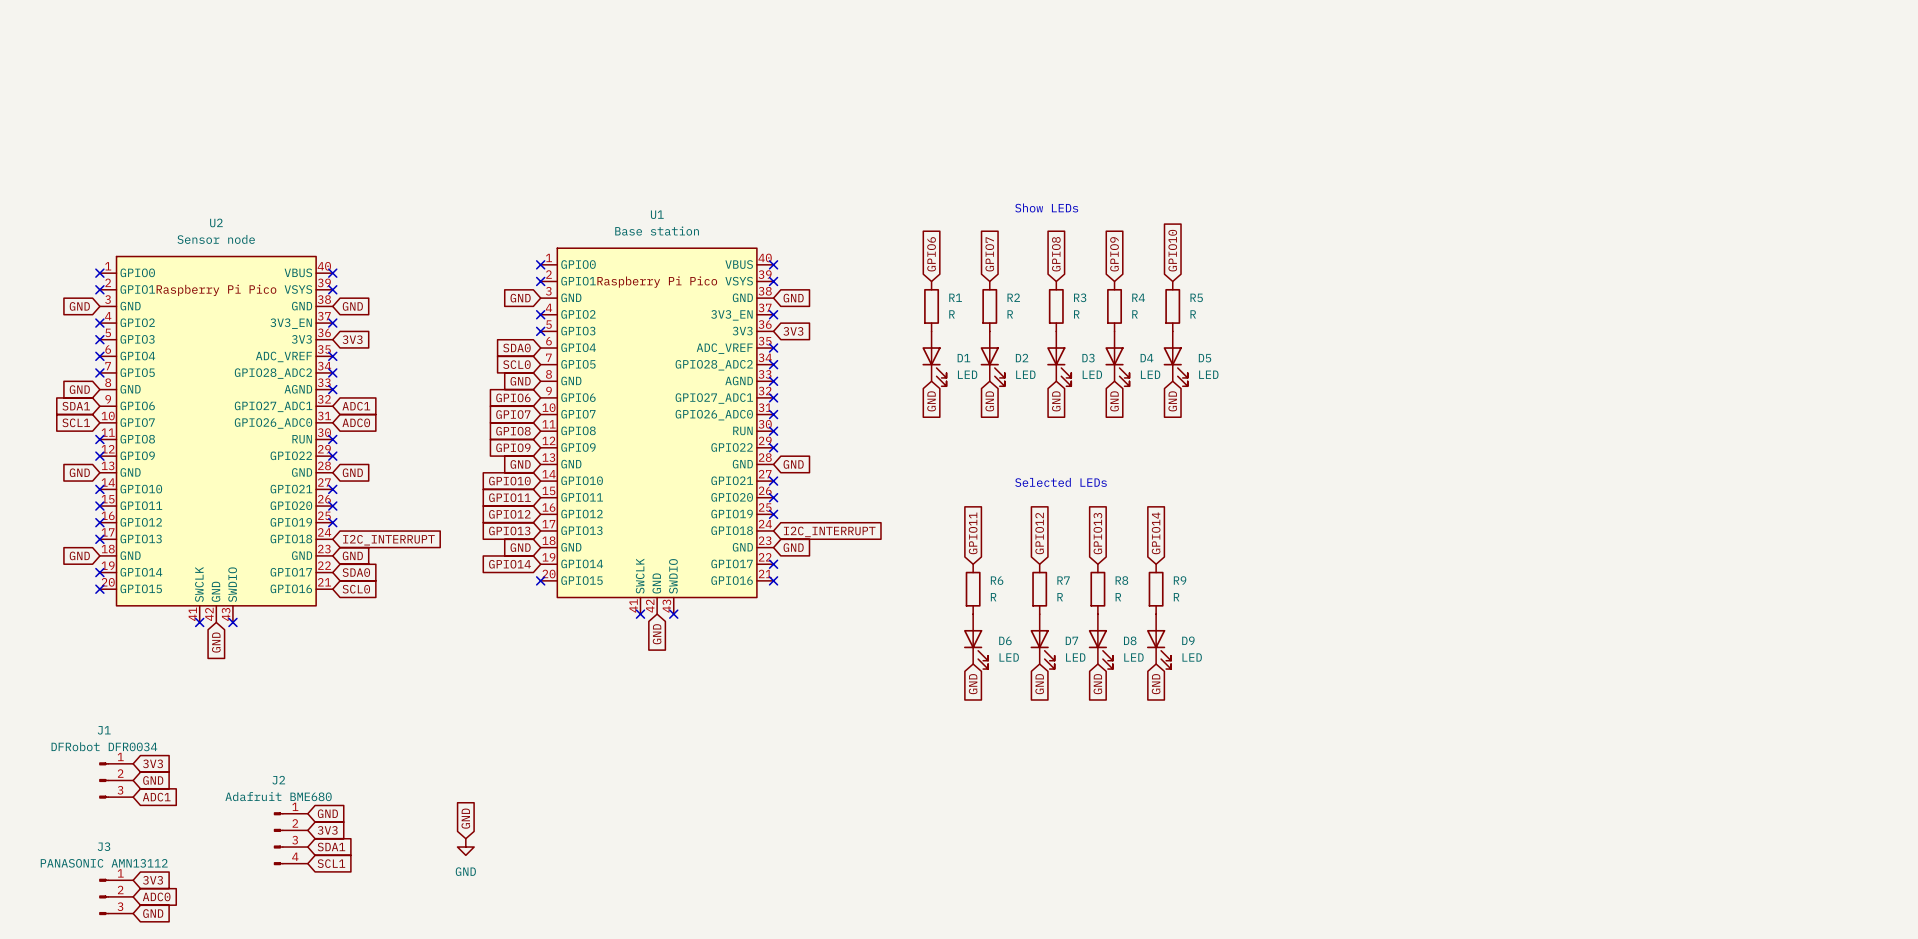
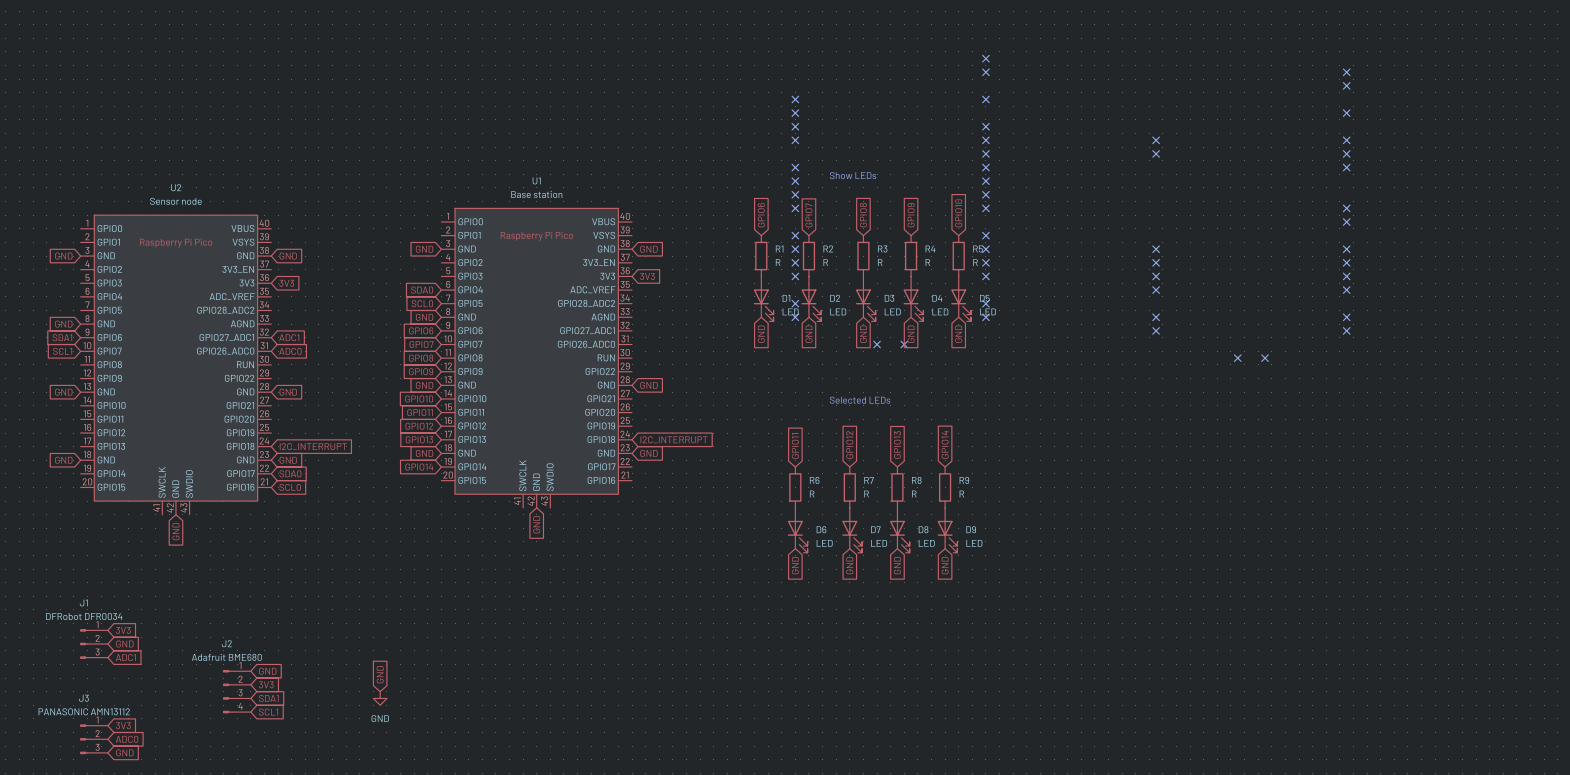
no-connect mark: none -> (985, 58)
no-connect mark: none -> (985, 72)
no-connect mark: none -> (1346, 72)
no-connect mark: none -> (1346, 85)
no-connect mark: none -> (795, 99)
no-connect mark: none -> (985, 99)
no-connect mark: none -> (795, 113)
no-connect mark: none -> (1346, 113)
no-connect mark: none -> (795, 126)
no-connect mark: none -> (985, 126)
no-connect mark: none -> (795, 140)
no-connect mark: none -> (985, 140)
no-connect mark: none -> (1156, 140)
no-connect mark: none -> (1346, 140)
no-connect mark: none -> (985, 153)
no-connect mark: none -> (1156, 153)
no-connect mark: none -> (1346, 153)
no-connect mark: none -> (795, 167)
no-connect mark: none -> (985, 167)
no-connect mark: none -> (1346, 167)
no-connect mark: none -> (795, 181)
no-connect mark: none -> (985, 181)
no-connect mark: none -> (795, 194)
no-connect mark: none -> (985, 194)
no-connect mark: none -> (795, 208)
no-connect mark: none -> (985, 208)
no-connect mark: none -> (1346, 208)
no-connect mark: (540, 264) -> none
no-connect mark: (773, 264) -> none
no-connect mark: none -> (1346, 222)
no-connect mark: (99, 273) -> none
no-connect mark: (332, 273) -> none
no-connect mark: (540, 281) -> none
no-connect mark: (773, 281) -> none
no-connect mark: none -> (795, 235)
no-connect mark: none -> (985, 235)
no-connect mark: (99, 289) -> none
no-connect mark: (332, 289) -> none
no-connect mark: none -> (795, 249)
no-connect mark: none -> (985, 249)
no-connect mark: none -> (1156, 249)
no-connect mark: none -> (1346, 249)
no-connect mark: (540, 314) -> none
no-connect mark: (773, 314) -> none
no-connect mark: none -> (795, 262)
no-connect mark: none -> (985, 262)
no-connect mark: none -> (1156, 262)
no-connect mark: none -> (1346, 262)
no-connect mark: (99, 323) -> none
no-connect mark: (332, 323) -> none
no-connect mark: (540, 331) -> none
no-connect mark: none -> (795, 276)
no-connect mark: none -> (985, 276)
no-connect mark: none -> (1156, 276)
no-connect mark: none -> (1346, 276)
no-connect mark: (99, 339) -> none
no-connect mark: (773, 348) -> none
no-connect mark: none -> (1156, 290)
no-connect mark: none -> (1346, 290)
no-connect mark: (99, 356) -> none
no-connect mark: (332, 356) -> none
no-connect mark: (773, 364) -> none
no-connect mark: none -> (795, 303)
no-connect mark: none -> (985, 303)
no-connect mark: (99, 372) -> none
no-connect mark: (332, 372) -> none
no-connect mark: (773, 381) -> none
no-connect mark: none -> (795, 317)
no-connect mark: none -> (985, 317)
no-connect mark: none -> (1156, 317)
no-connect mark: none -> (1346, 317)
no-connect mark: (332, 389) -> none
no-connect mark: (773, 397) -> none
no-connect mark: none -> (1156, 330)
no-connect mark: none -> (1346, 330)
no-connect mark: (773, 414) -> none
no-connect mark: none -> (877, 344)
no-connect mark: none -> (904, 344)
no-connect mark: (773, 431) -> none
no-connect mark: none -> (1237, 358)
no-connect mark: none -> (1265, 358)
no-connect mark: (99, 439) -> none
no-connect mark: (332, 439) -> none
no-connect mark: (773, 447) -> none
no-connect mark: (99, 456) -> none
no-connect mark: (332, 456) -> none
no-connect mark: (773, 481) -> none
no-connect mark: (99, 489) -> none
no-connect mark: (332, 489) -> none
no-connect mark: (773, 497) -> none
no-connect mark: (99, 506) -> none
no-connect mark: (332, 506) -> none
no-connect mark: (773, 514) -> none
no-connect mark: (99, 522) -> none
no-connect mark: (332, 522) -> none
no-connect mark: (99, 539) -> none
no-connect mark: (773, 564) -> none
no-connect mark: (99, 572) -> none
no-connect mark: (540, 580) -> none
no-connect mark: (773, 580) -> none
no-connect mark: (99, 589) -> none
no-connect mark: (640, 614) -> none
no-connect mark: (673, 614) -> none
no-connect mark: (199, 622) -> none
no-connect mark: (232, 622) -> none

